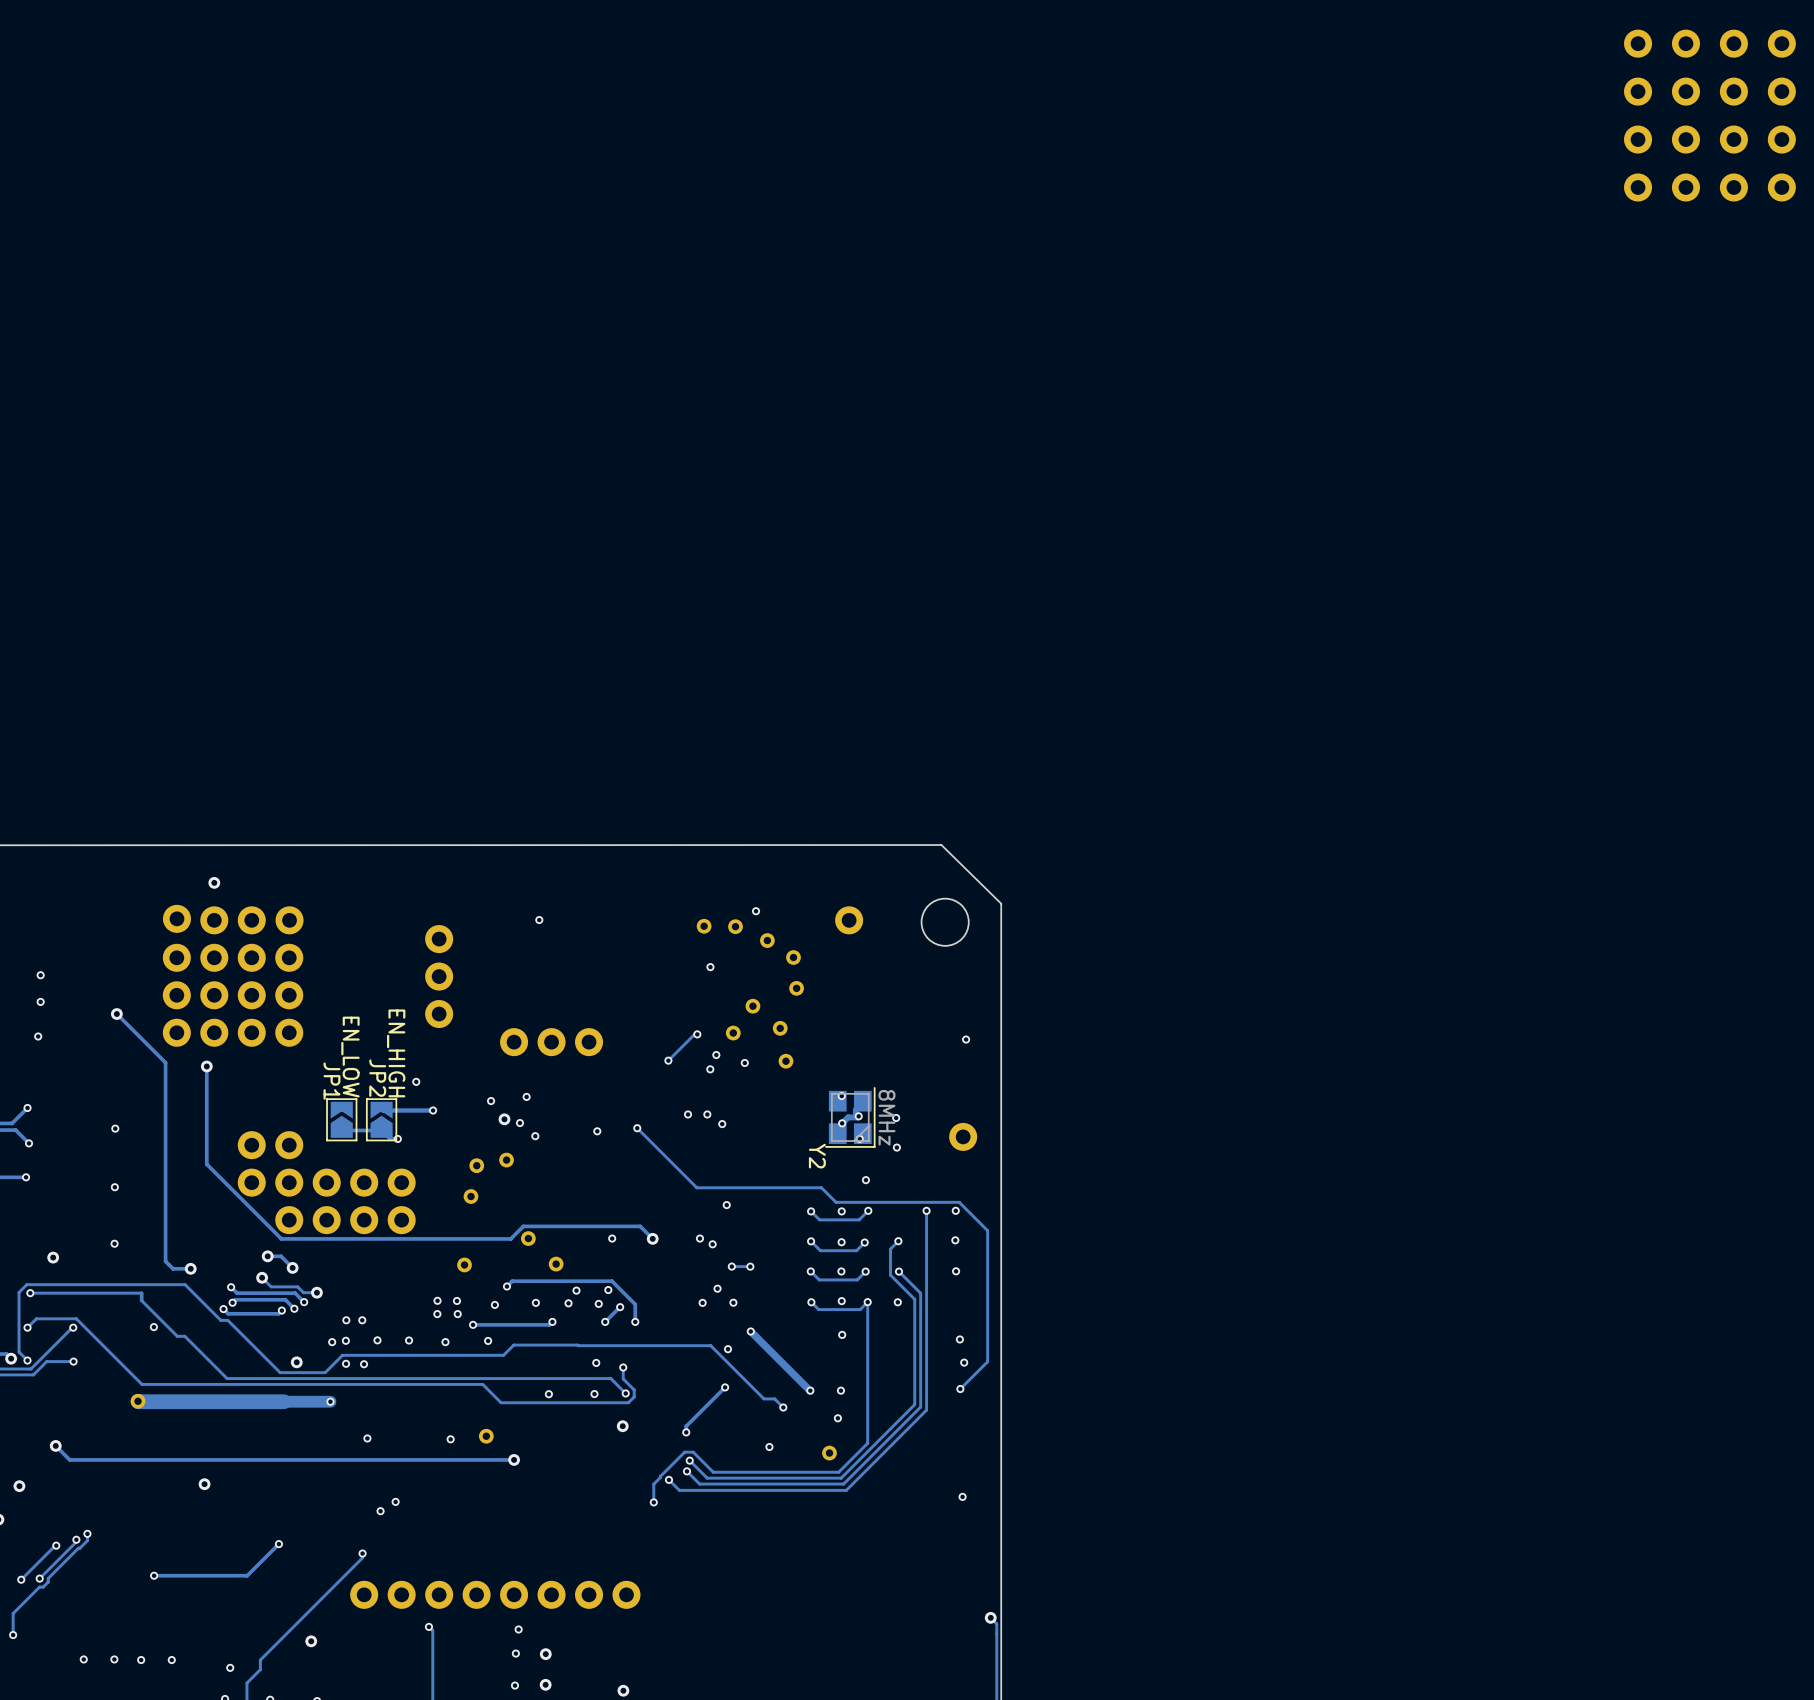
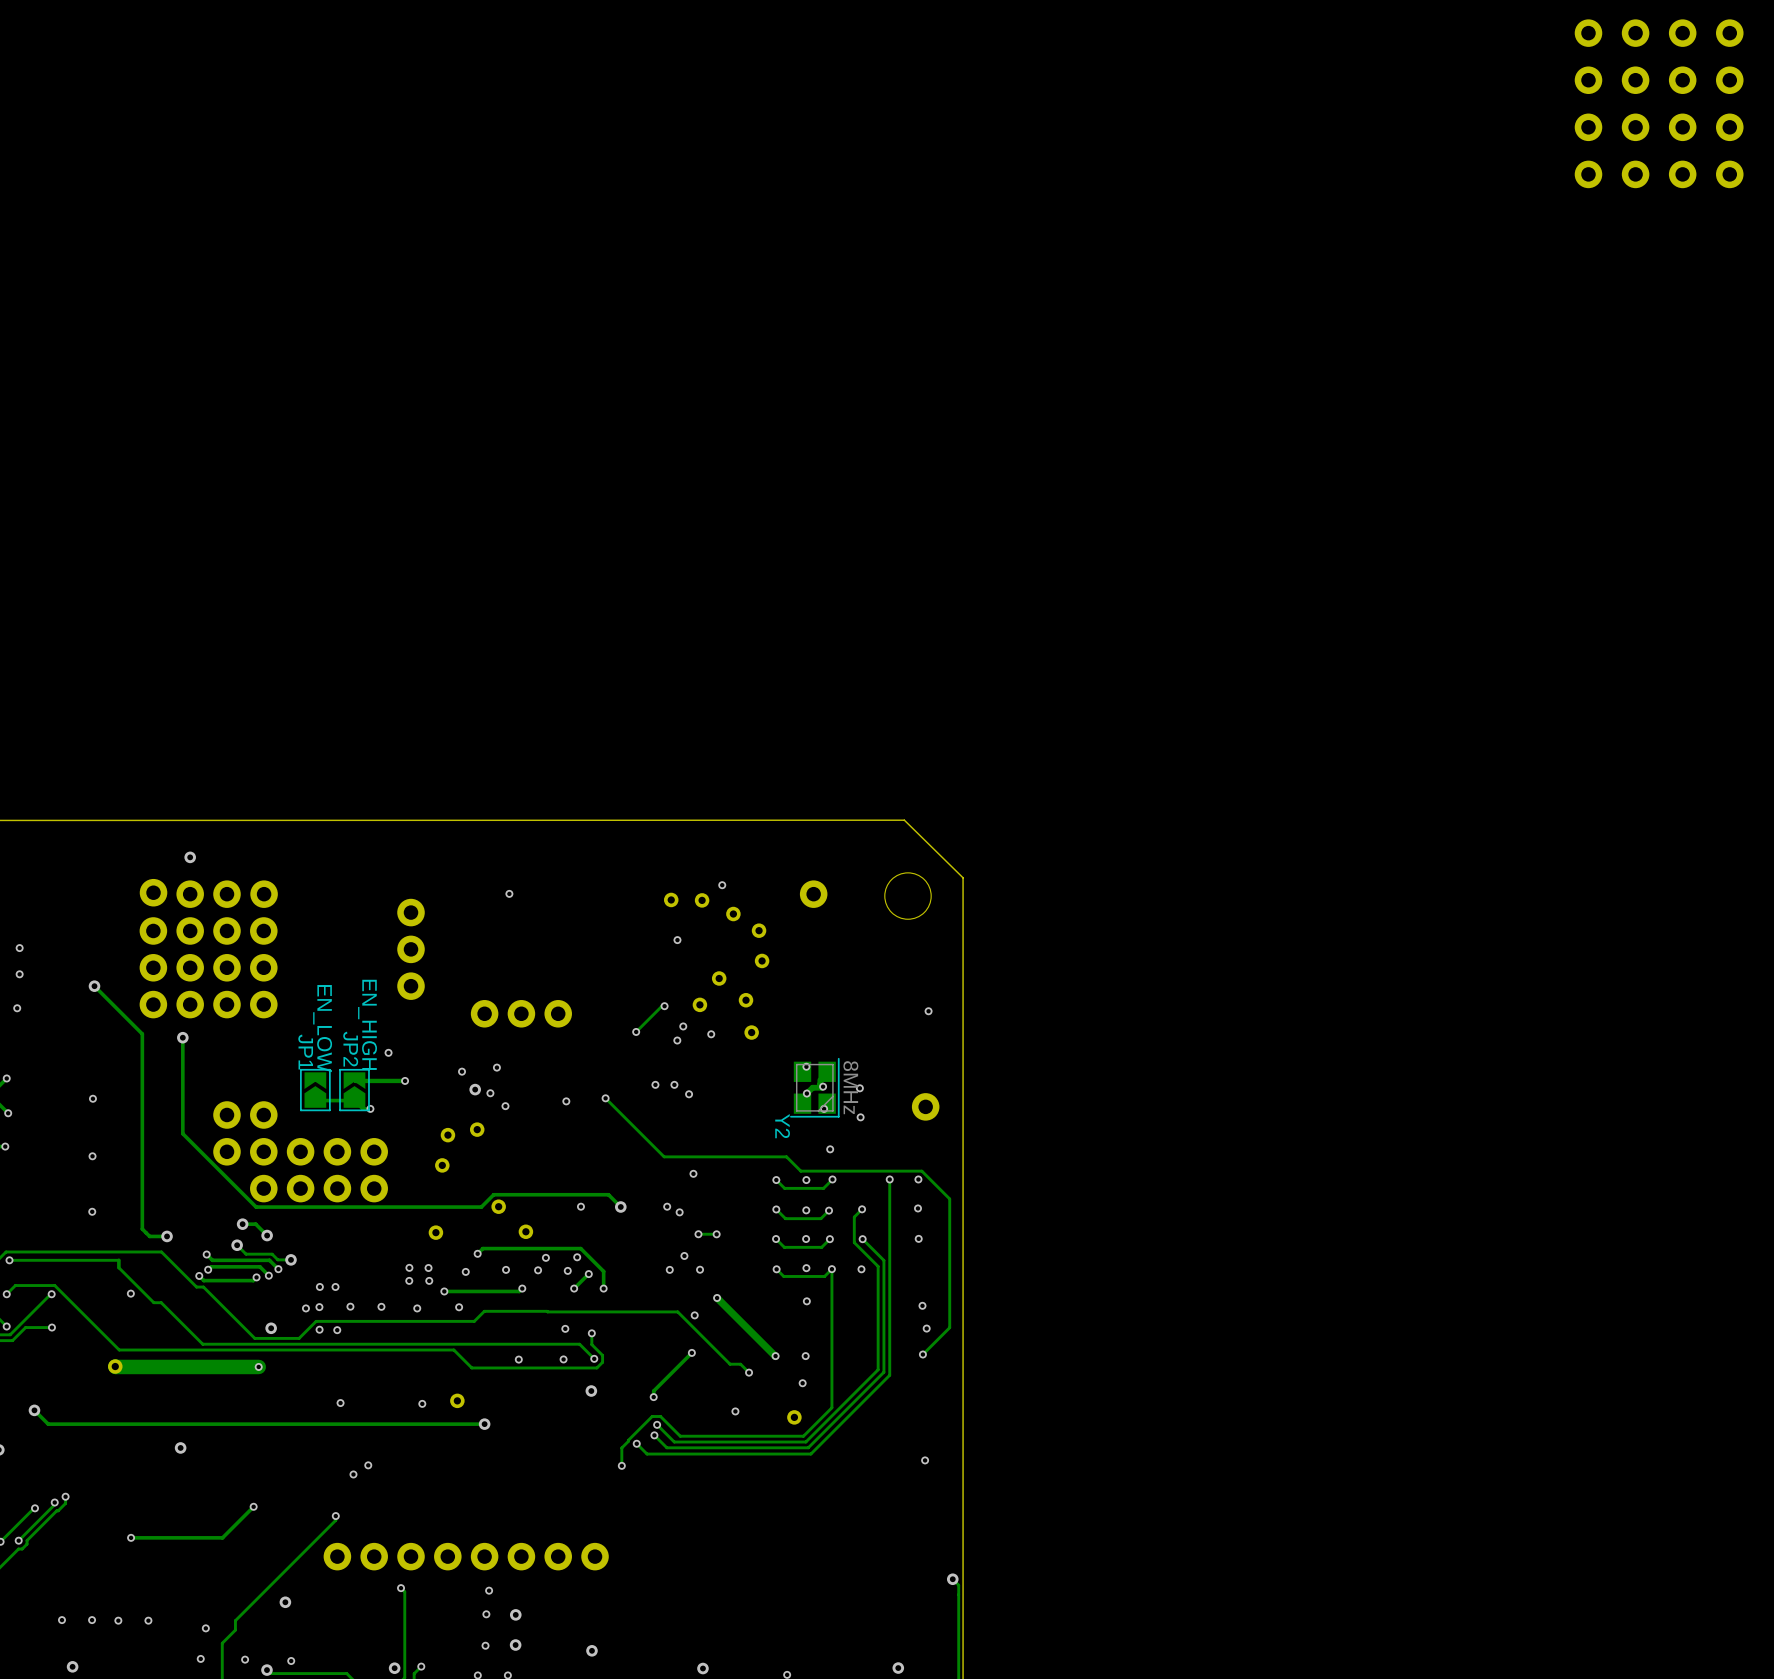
via: (53, 1257) -> none
track: (330, 1401) (284, 1401) -> none
via position: (330, 1401) -> (258, 1366)

